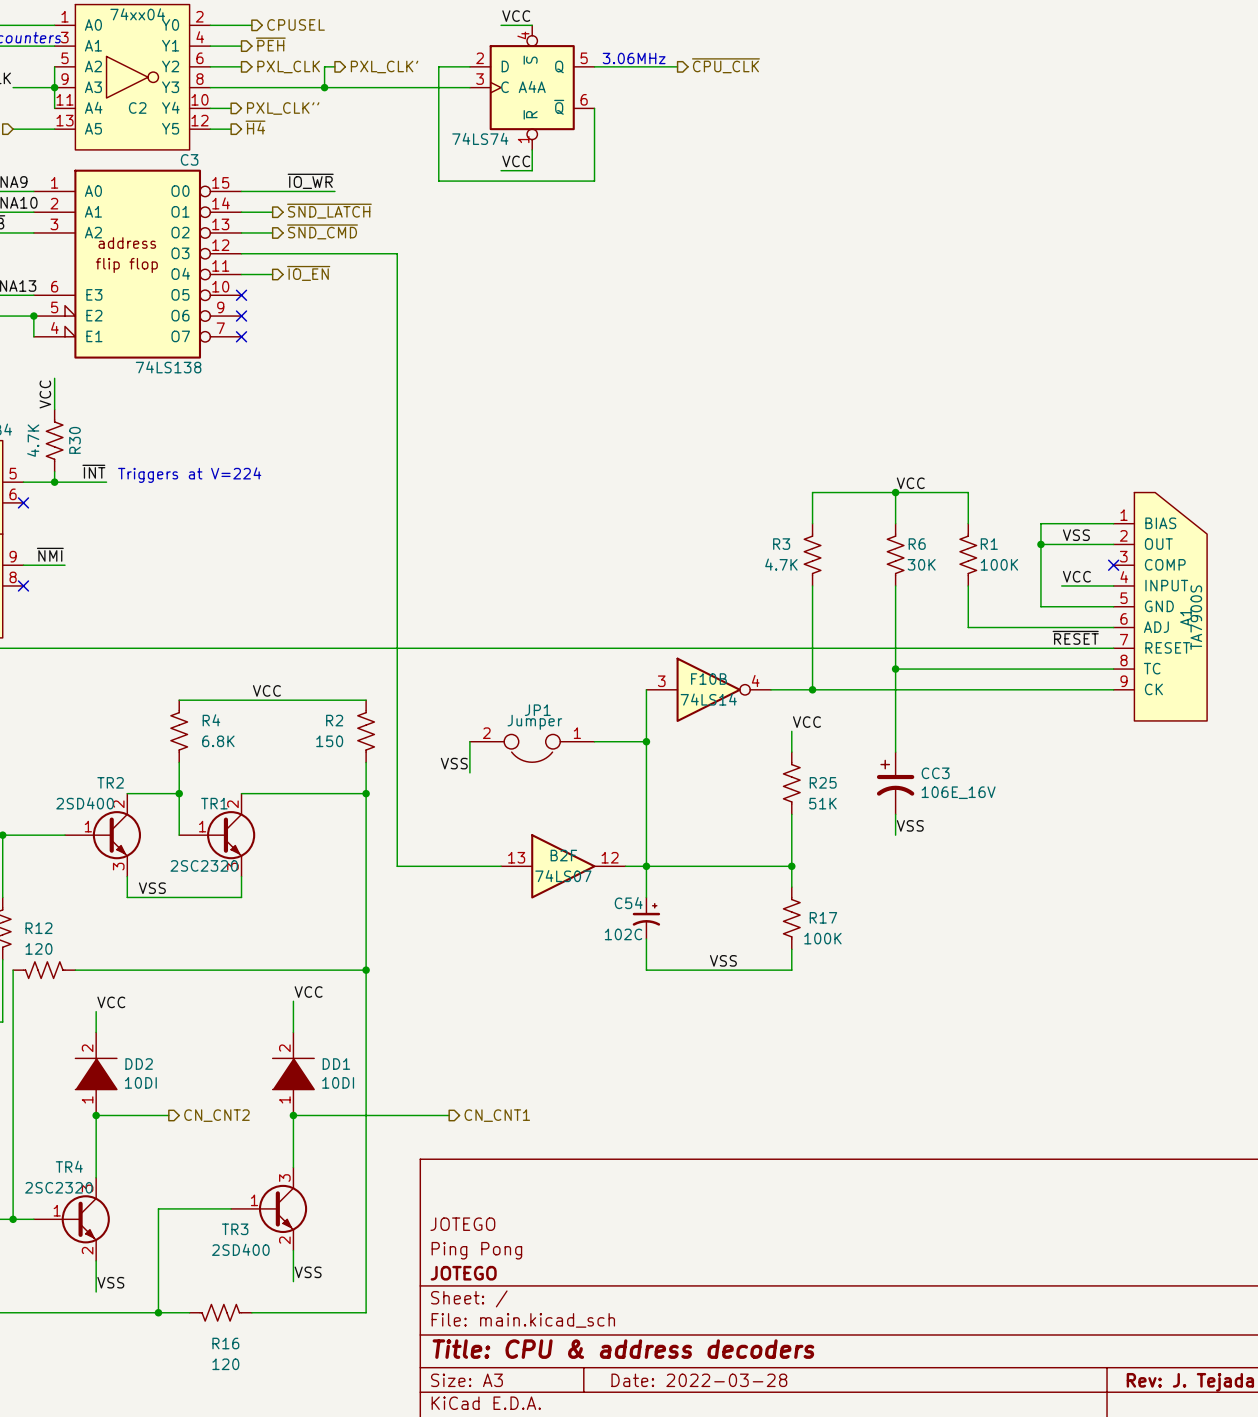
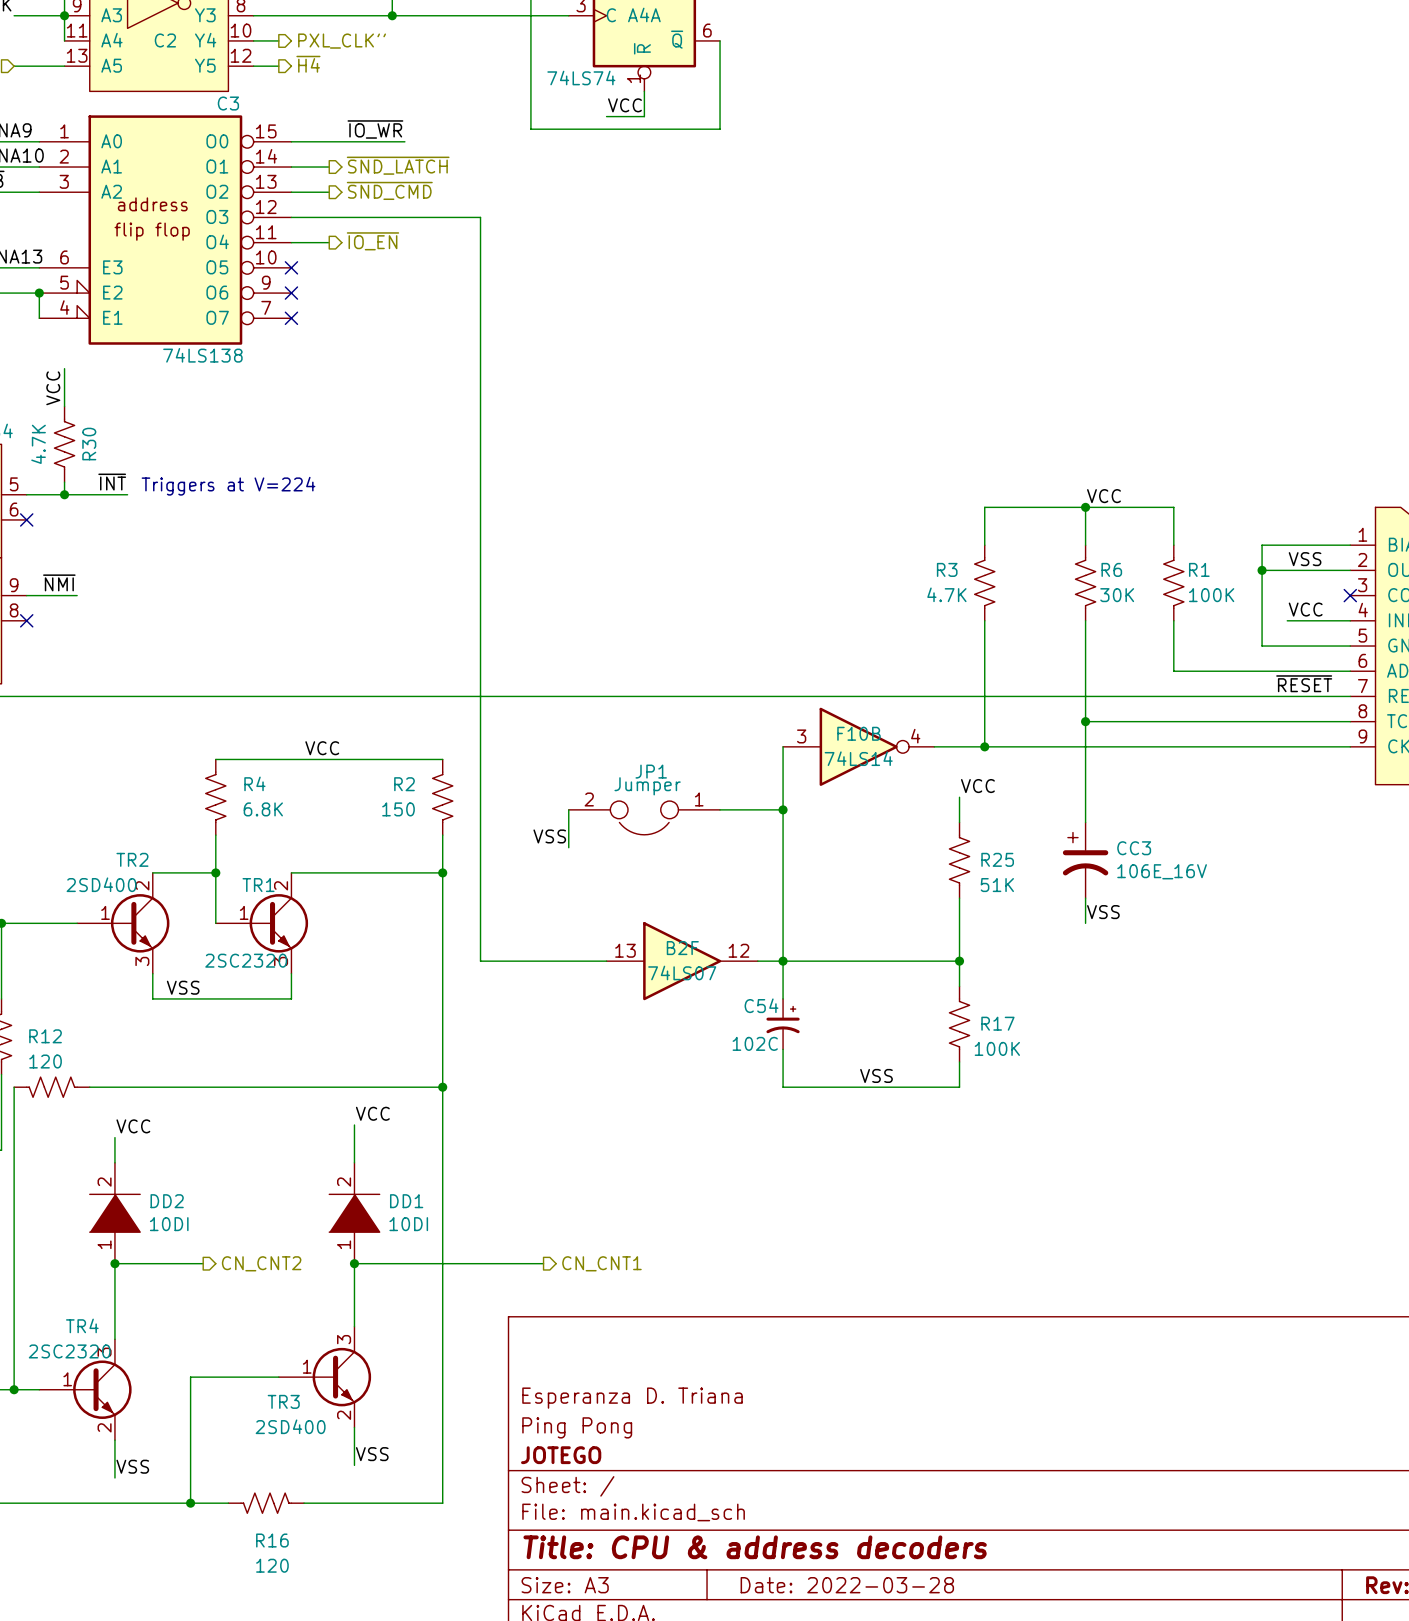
title block: JOTEGO (462, 1224) -> Esperanza D. Triana (632, 1398)

